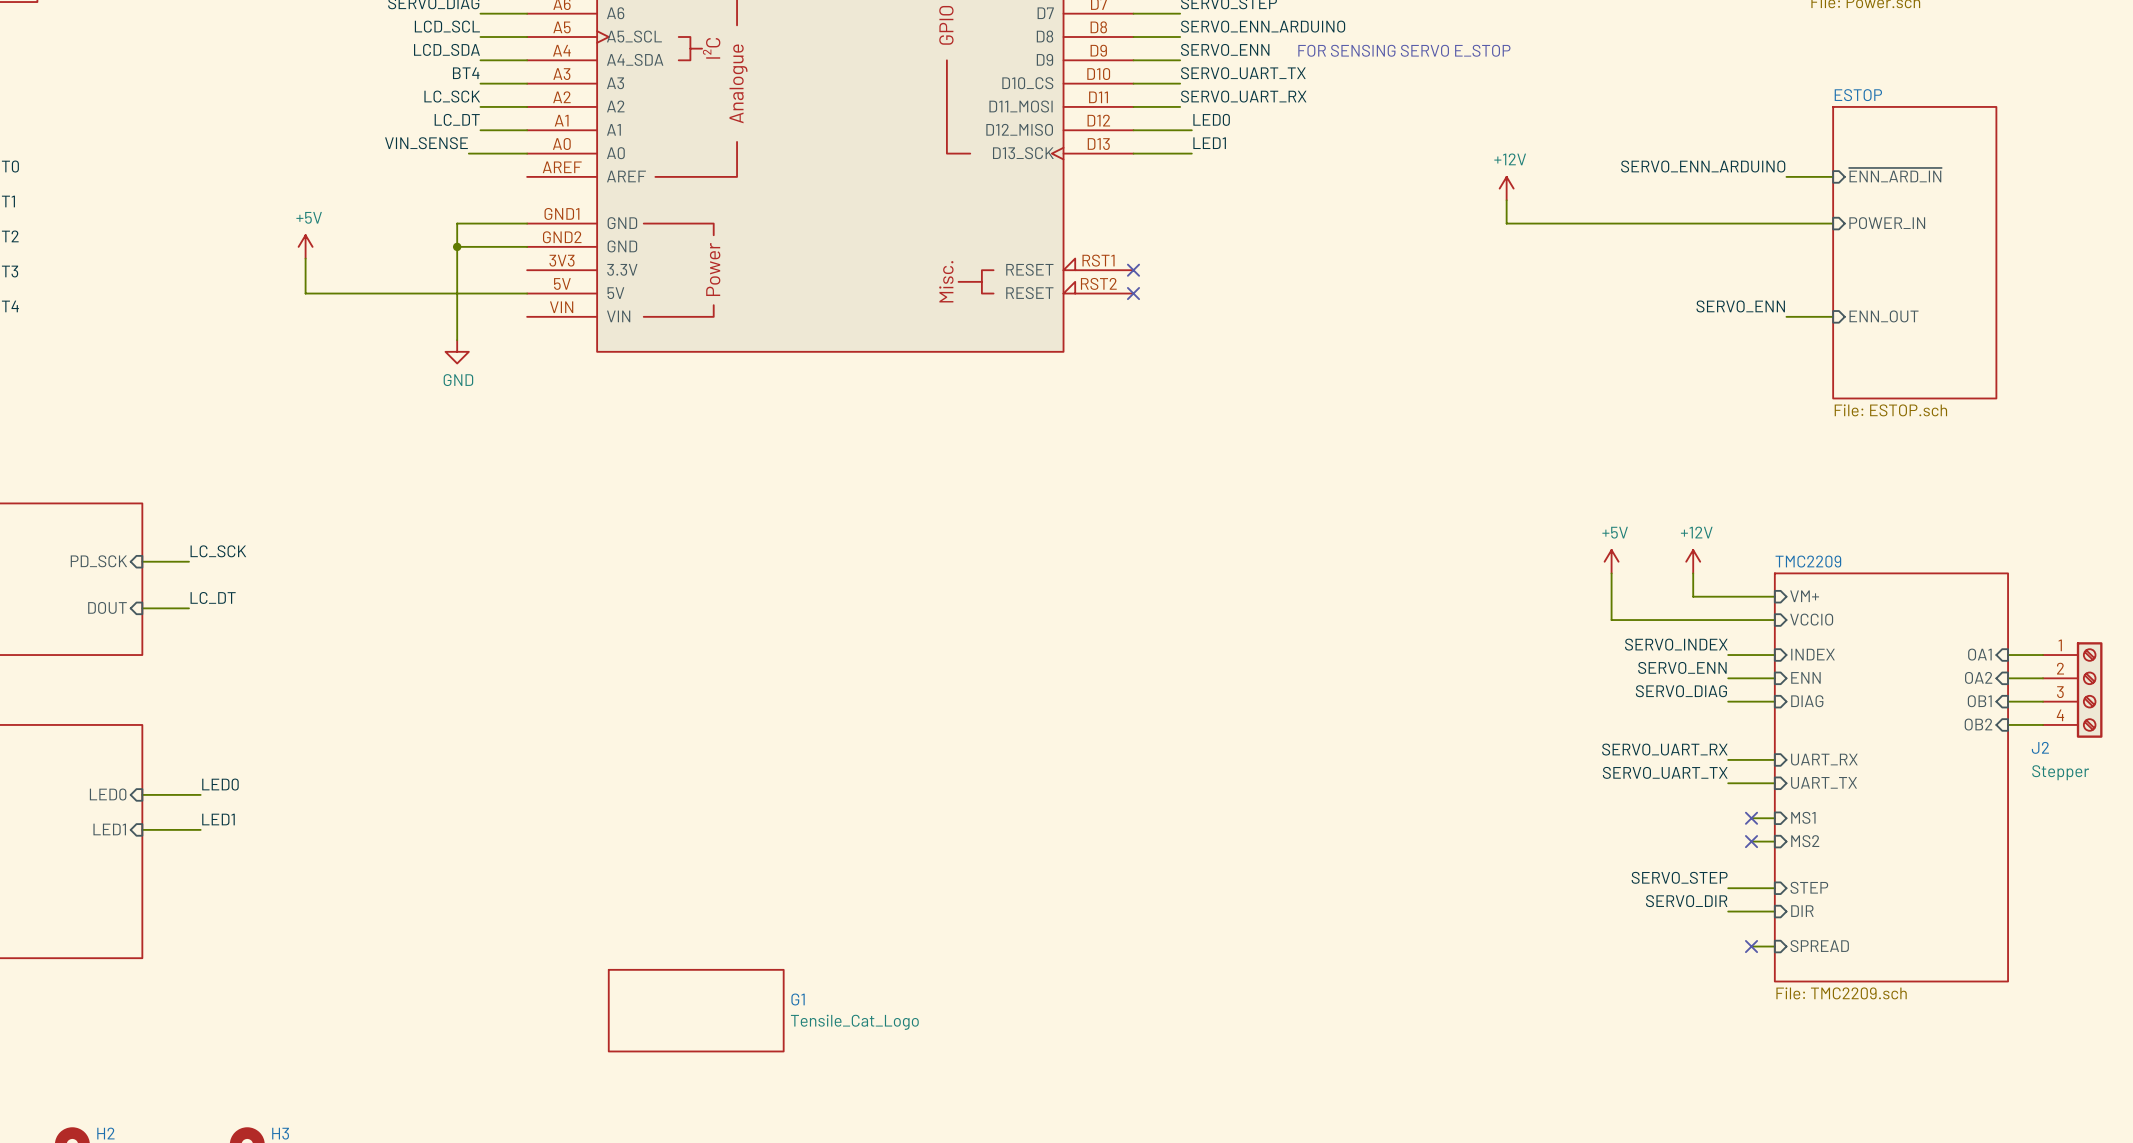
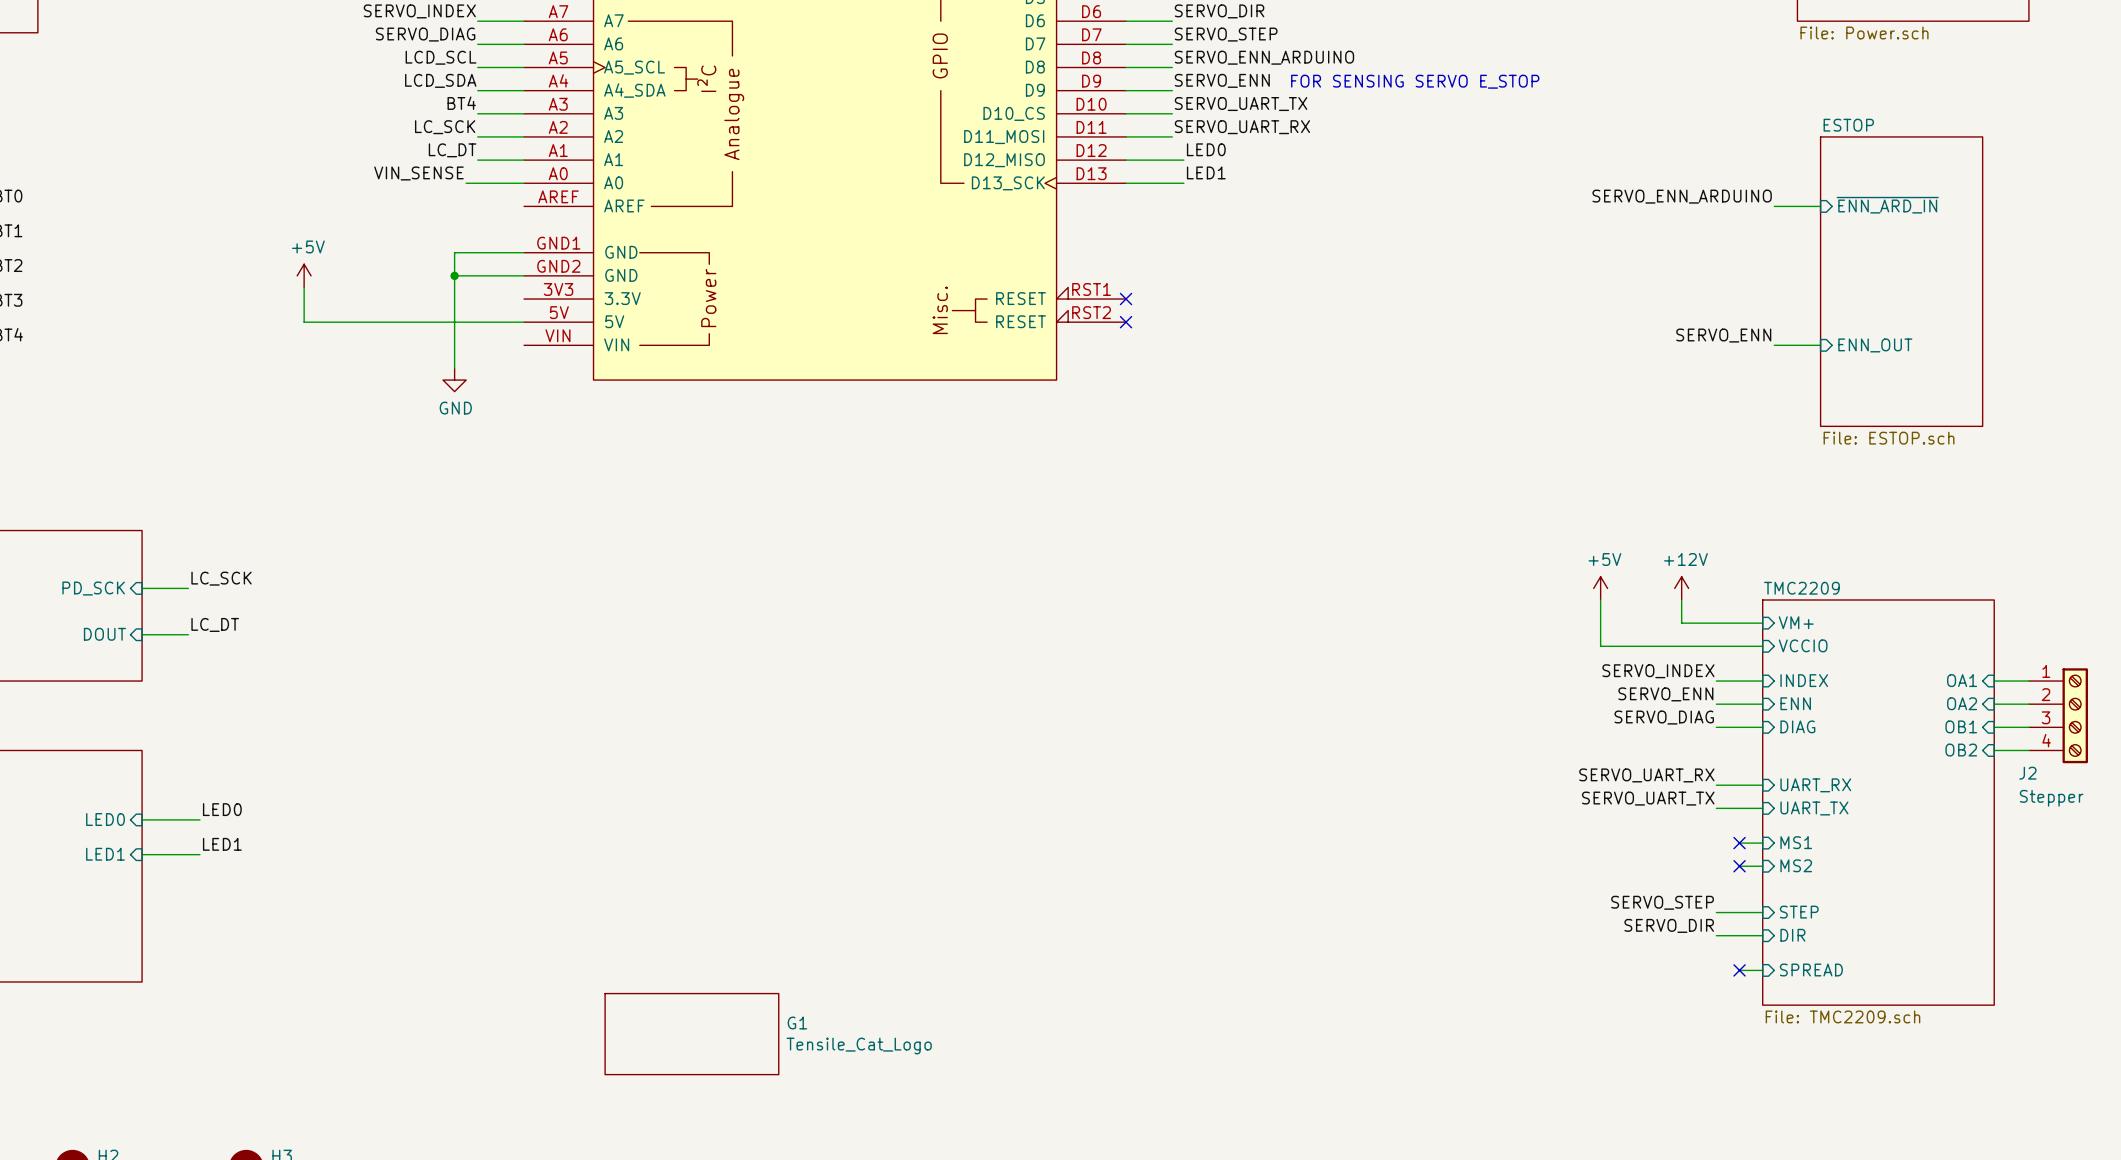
power symbol: +12V (1506, 188) -> none
wire: (1506, 200) (1506, 223) (1833, 223) -> none
sheet pin: POWER_IN (1887, 223) -> none

